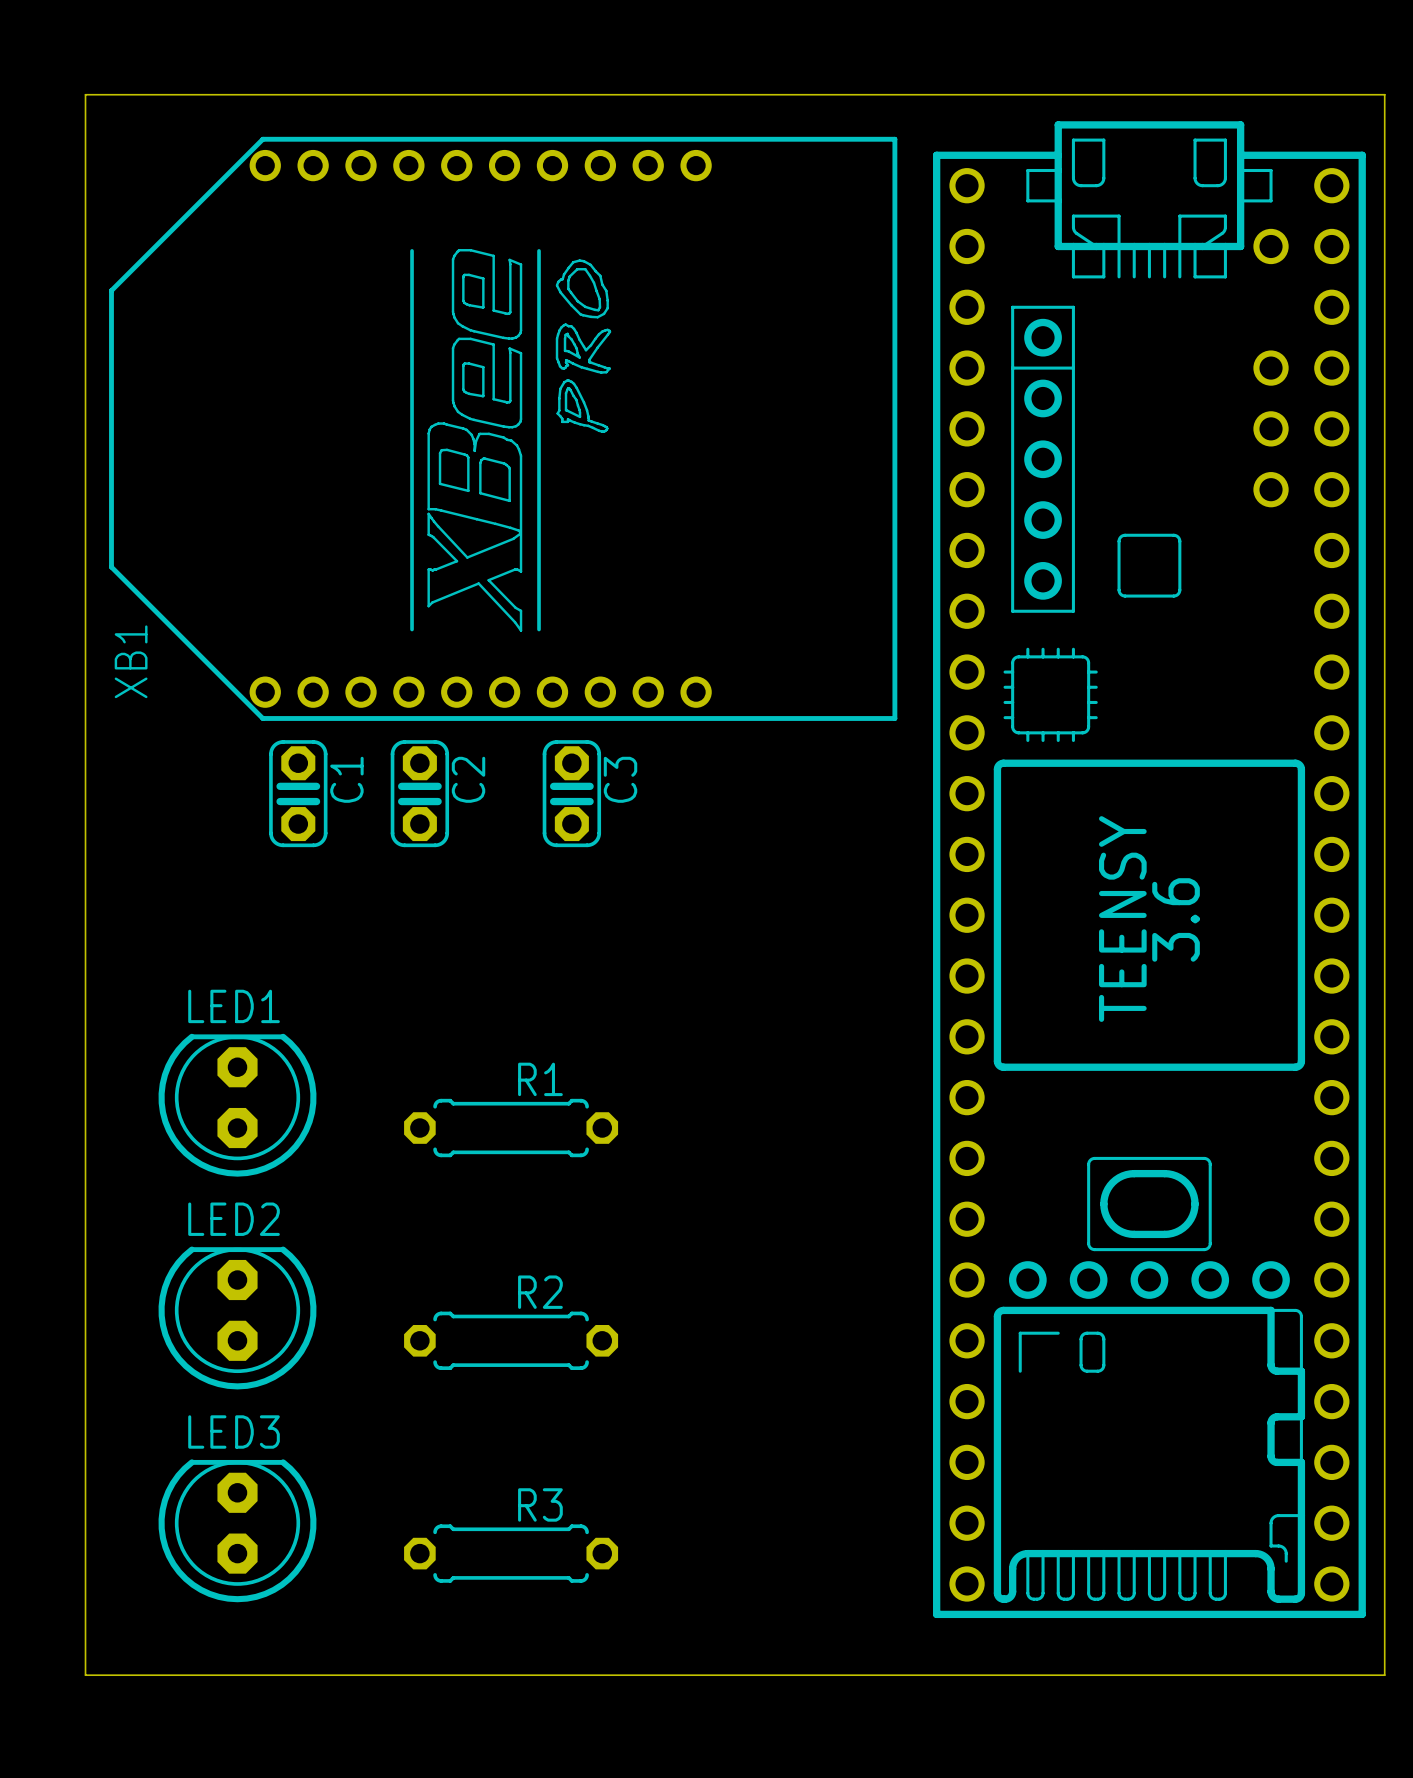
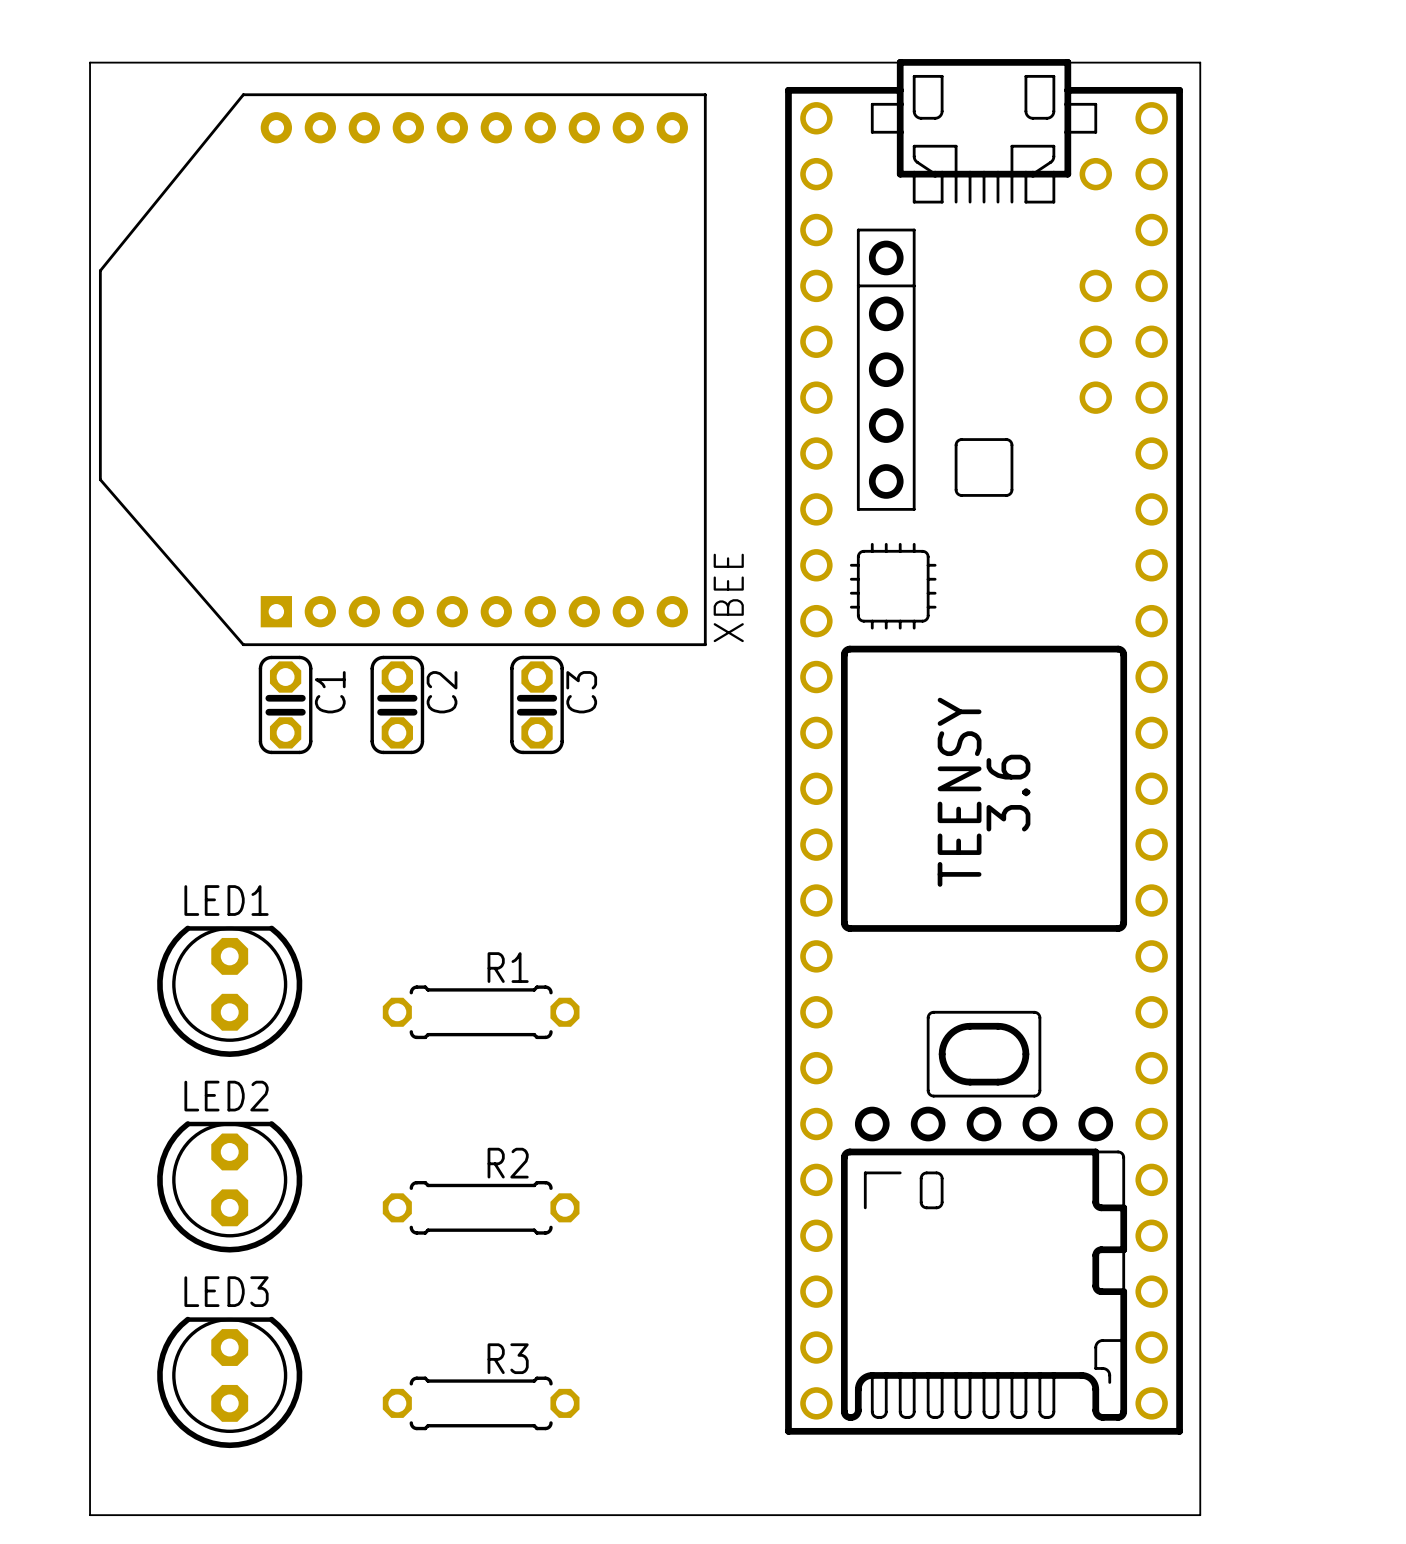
board edge: (1293, 94) (1384, 94) (1384, 1675) (1293, 1675) -> (1200, 62) (1200, 1515)
XBEE: none -> (402, 369)
XB1: (503, 428) -> none
part position: (1149, 869) -> (984, 746)

